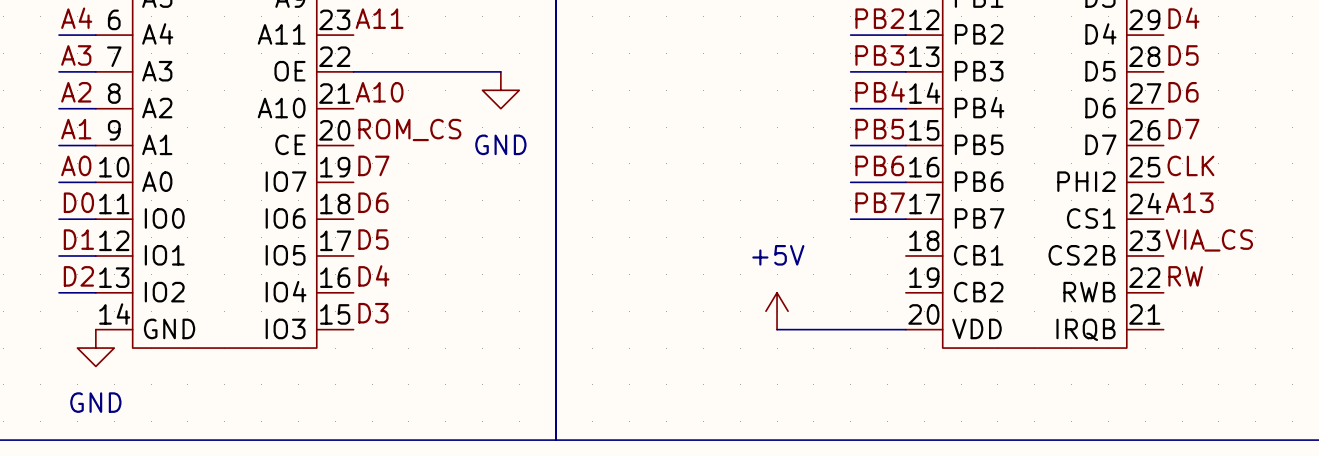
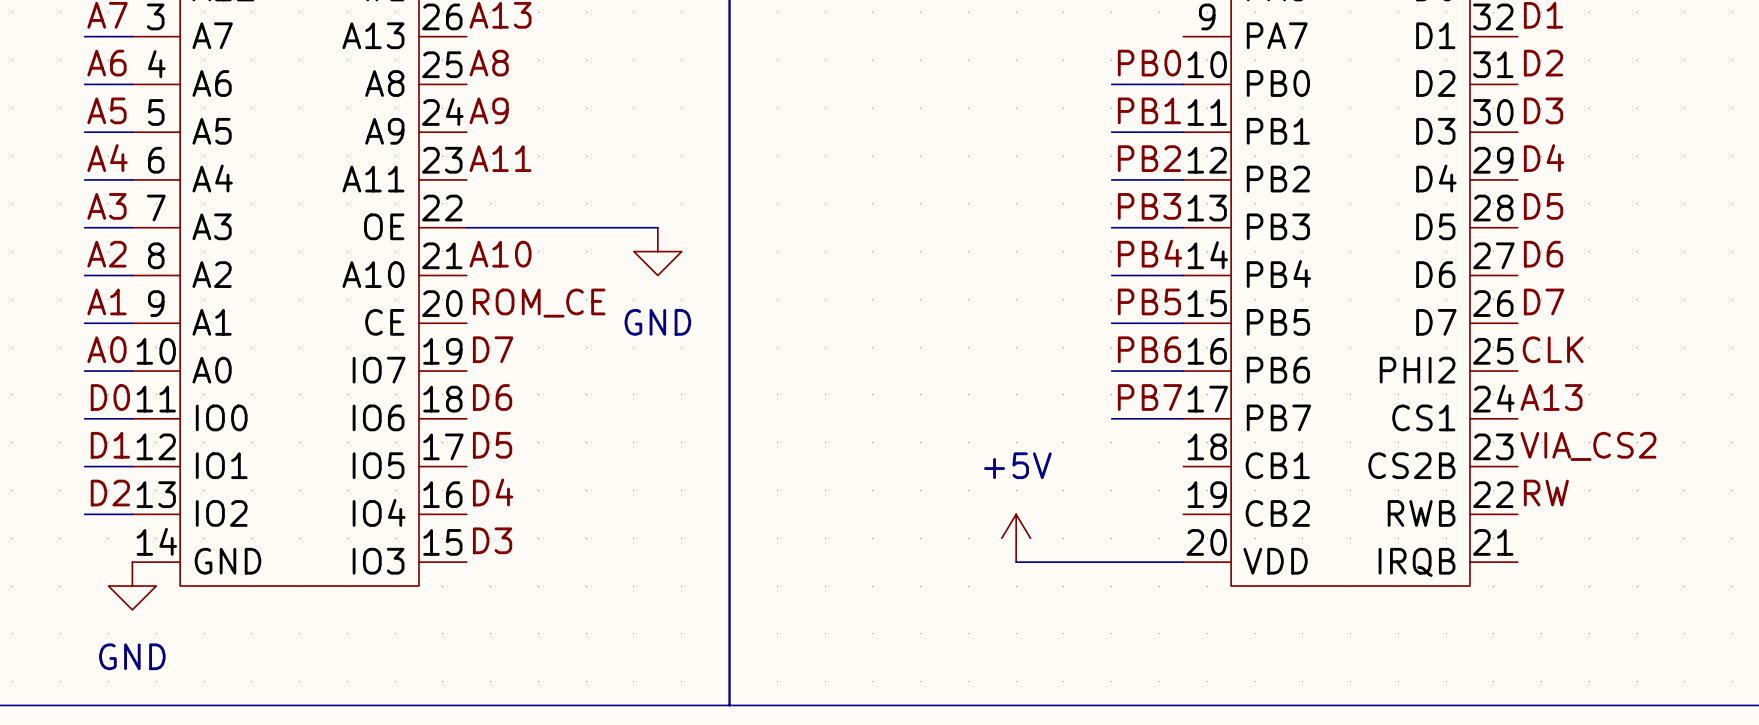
label: ROM_CS (409, 129) -> ROM_CE (539, 303)
label: VIA_CS (1209, 240) -> VIA_CS2 (1588, 446)

